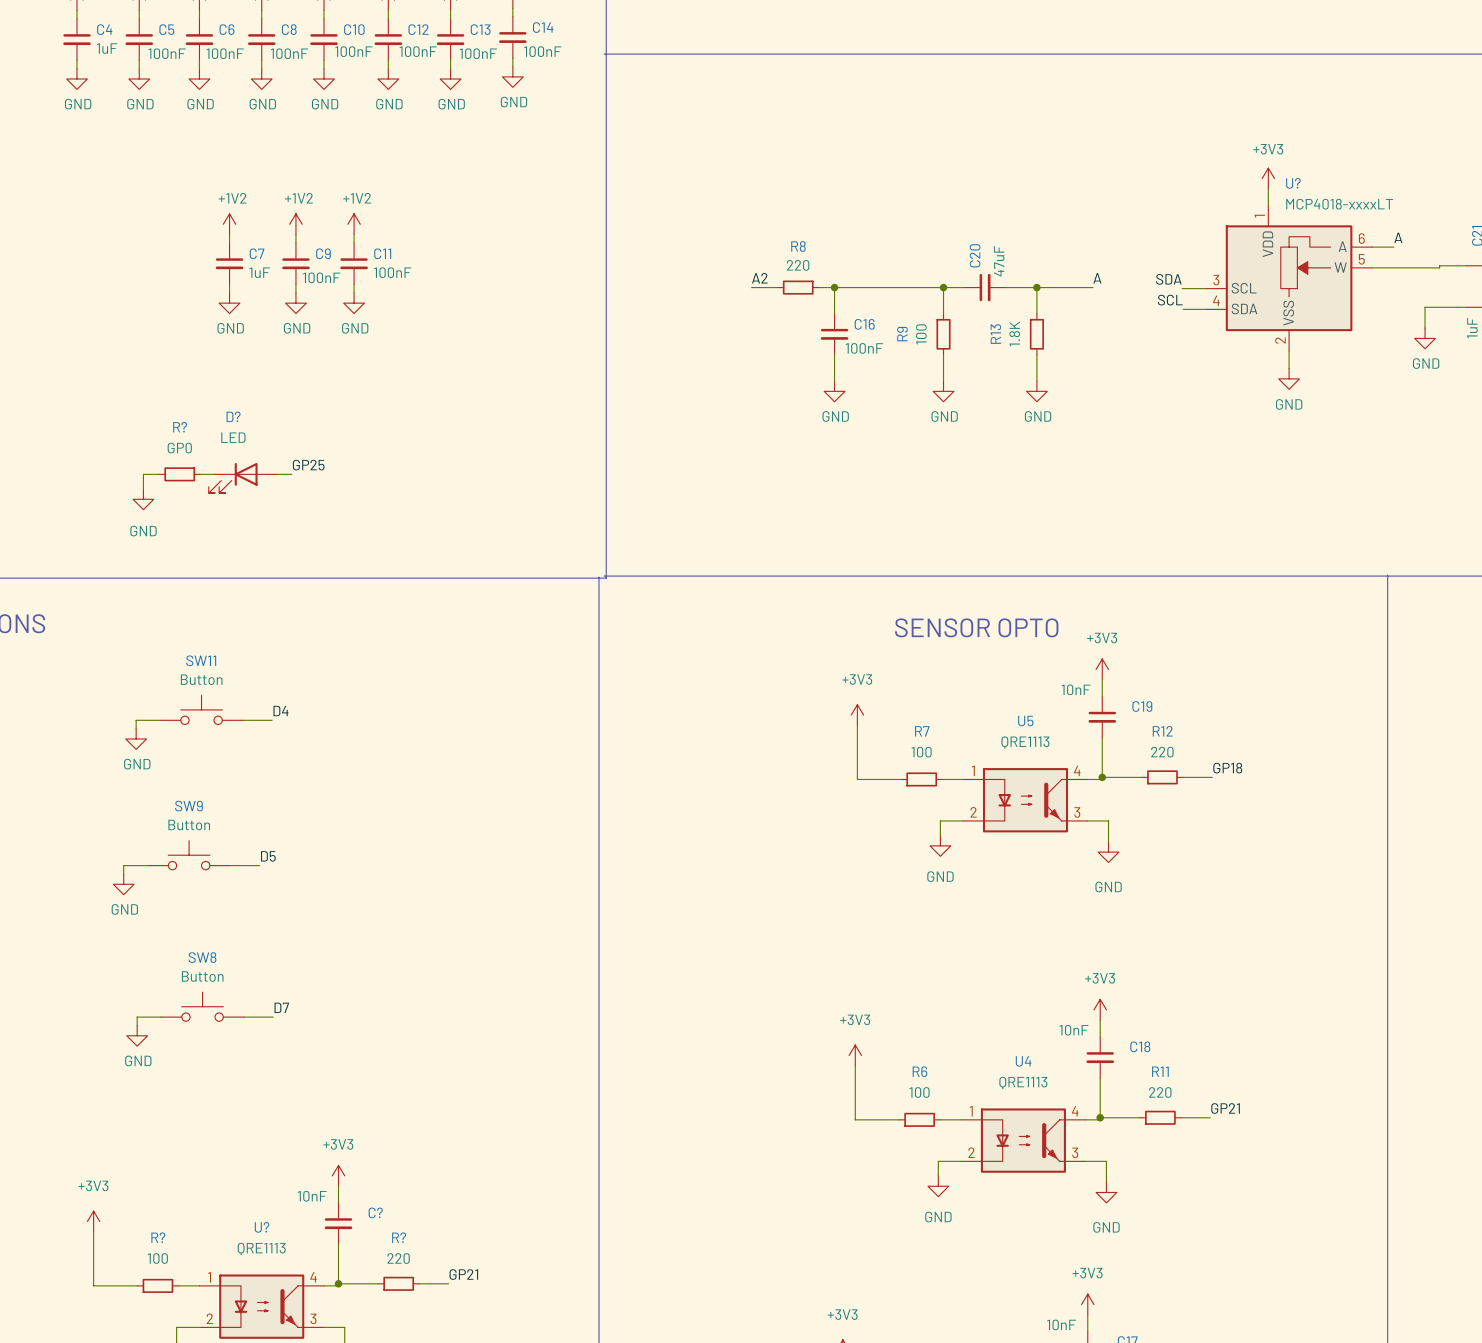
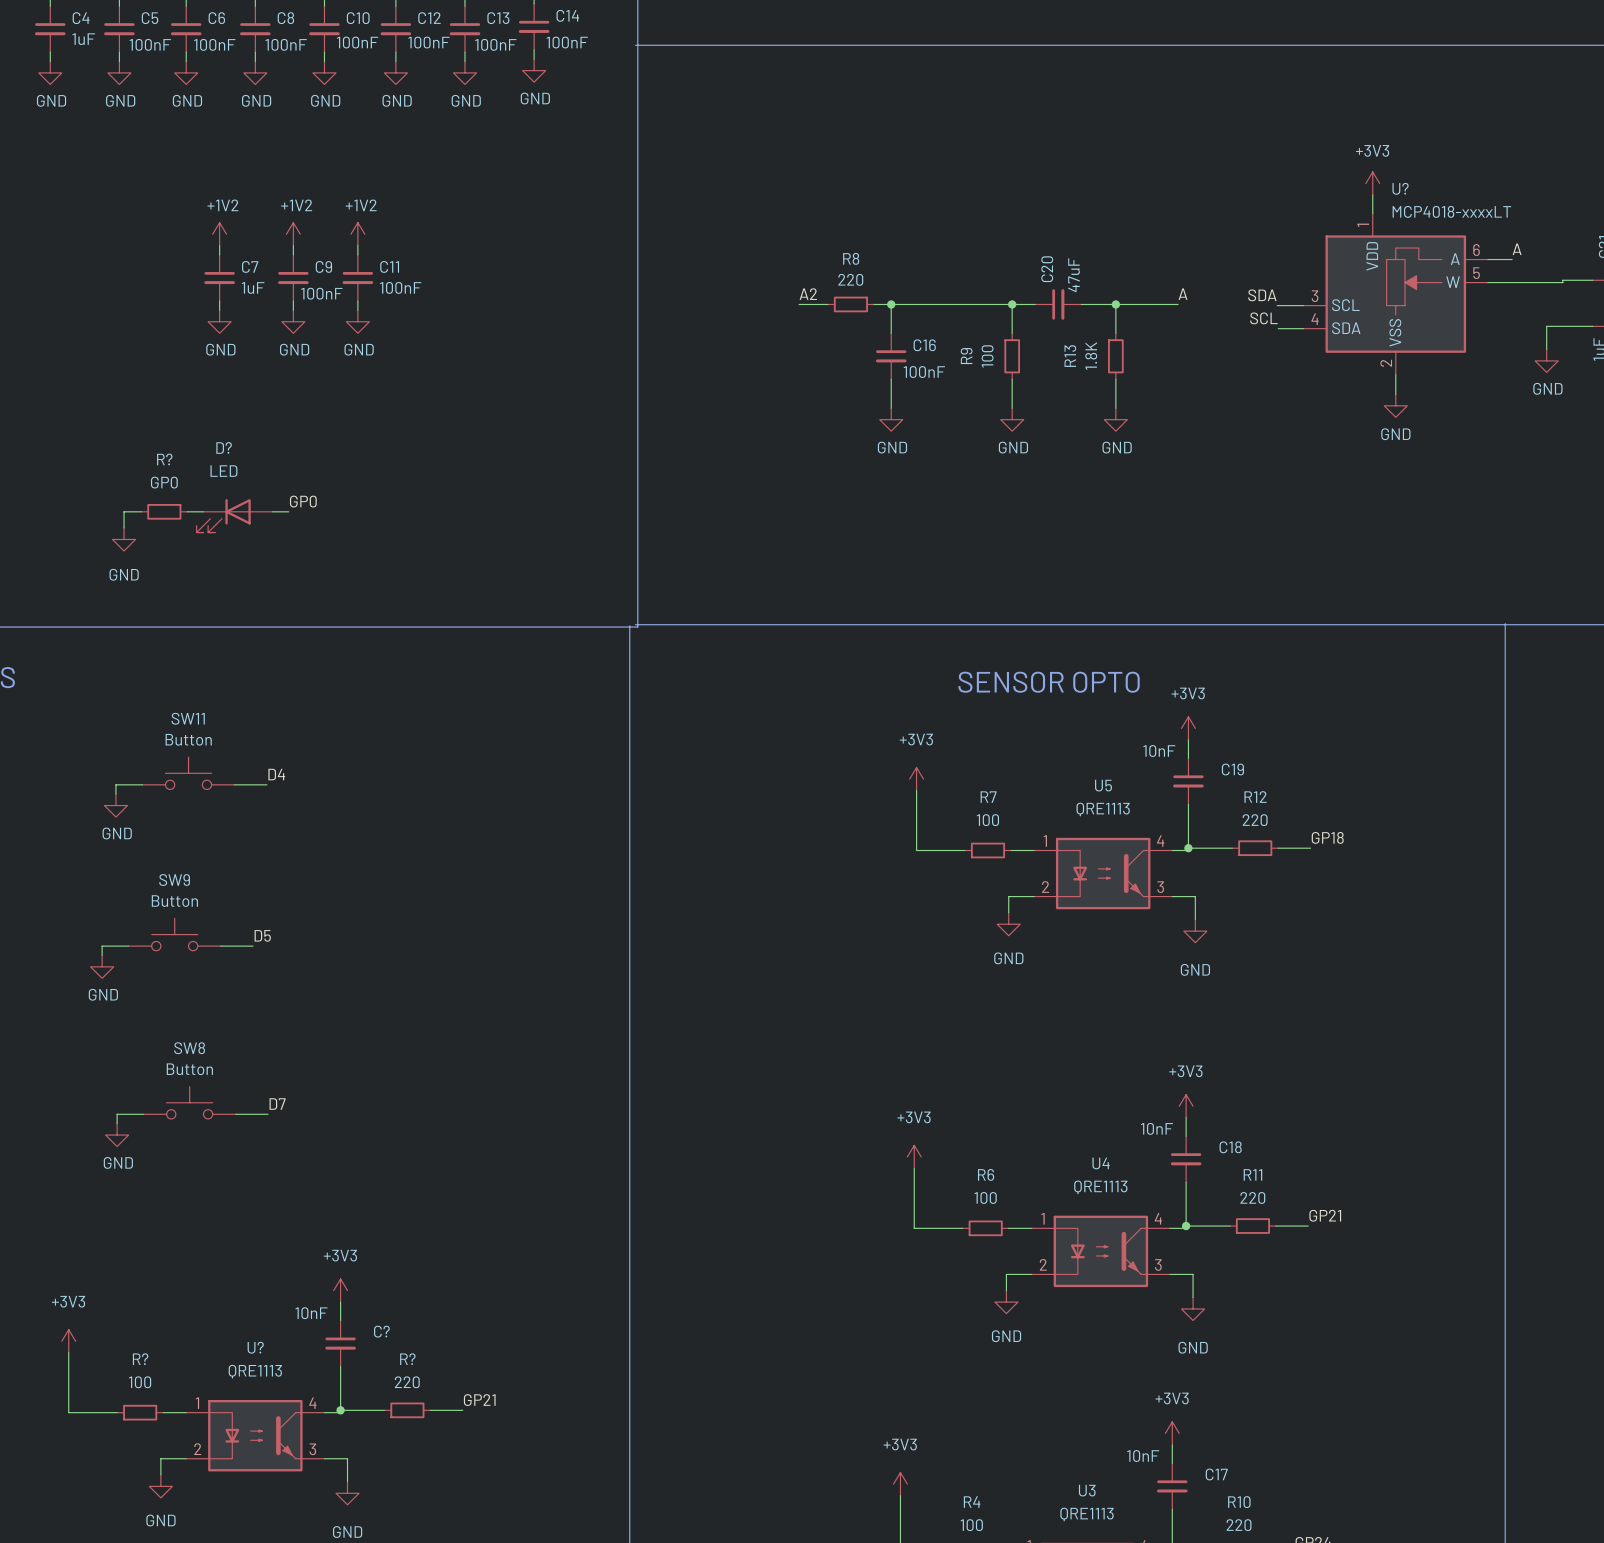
label: GP25 (308, 465) -> GP0 (303, 501)

